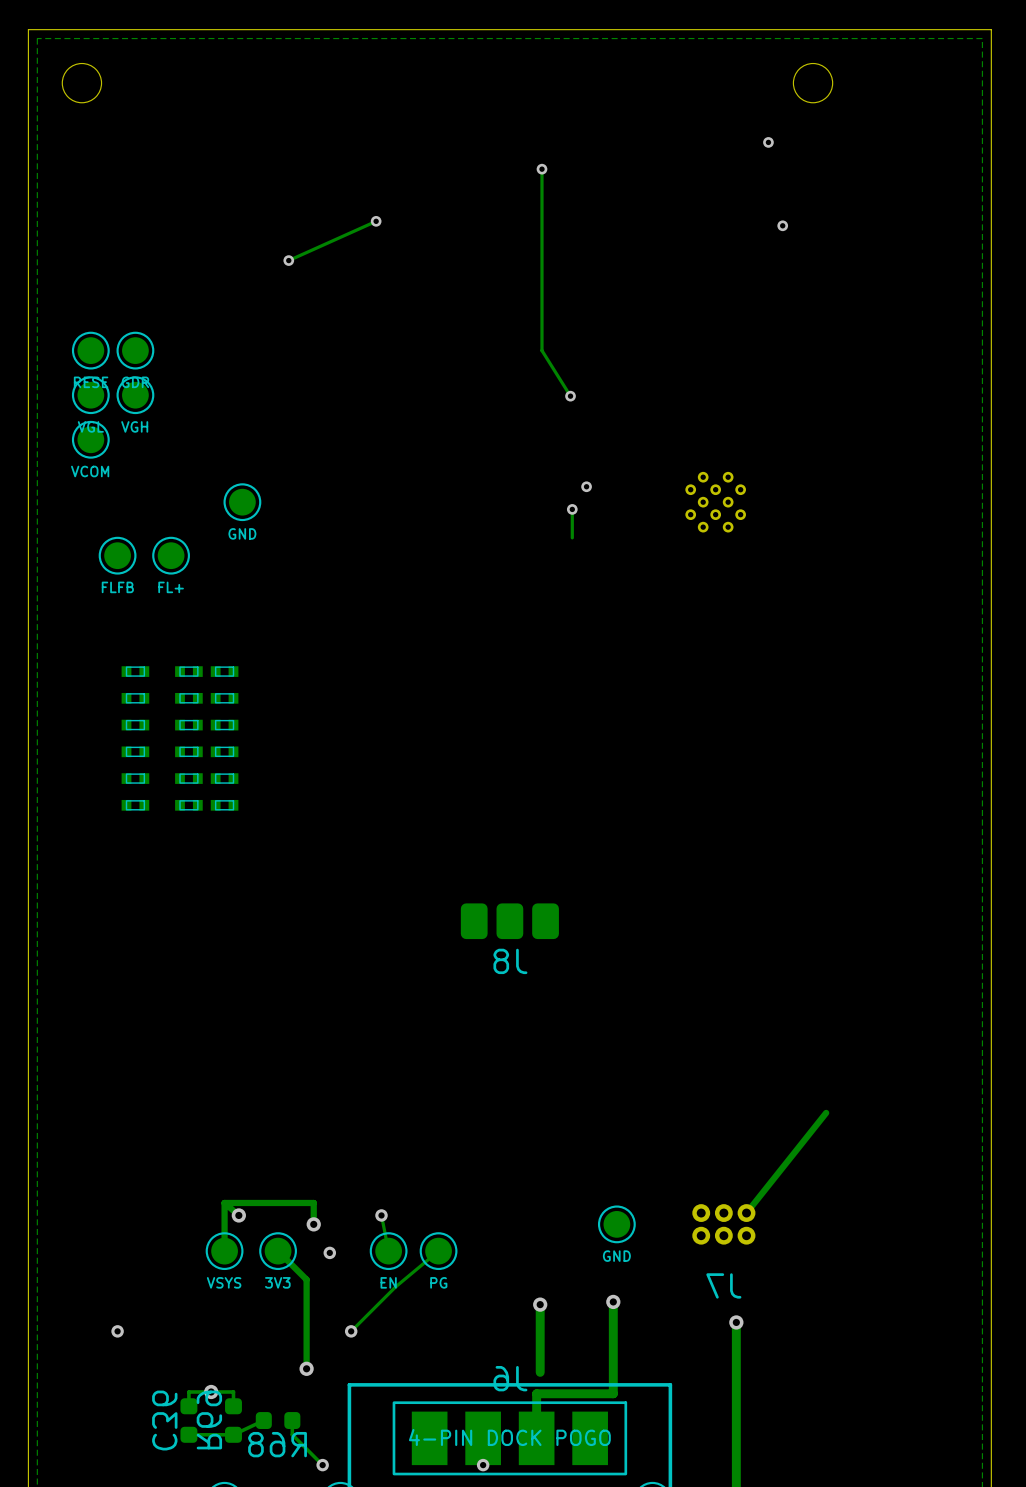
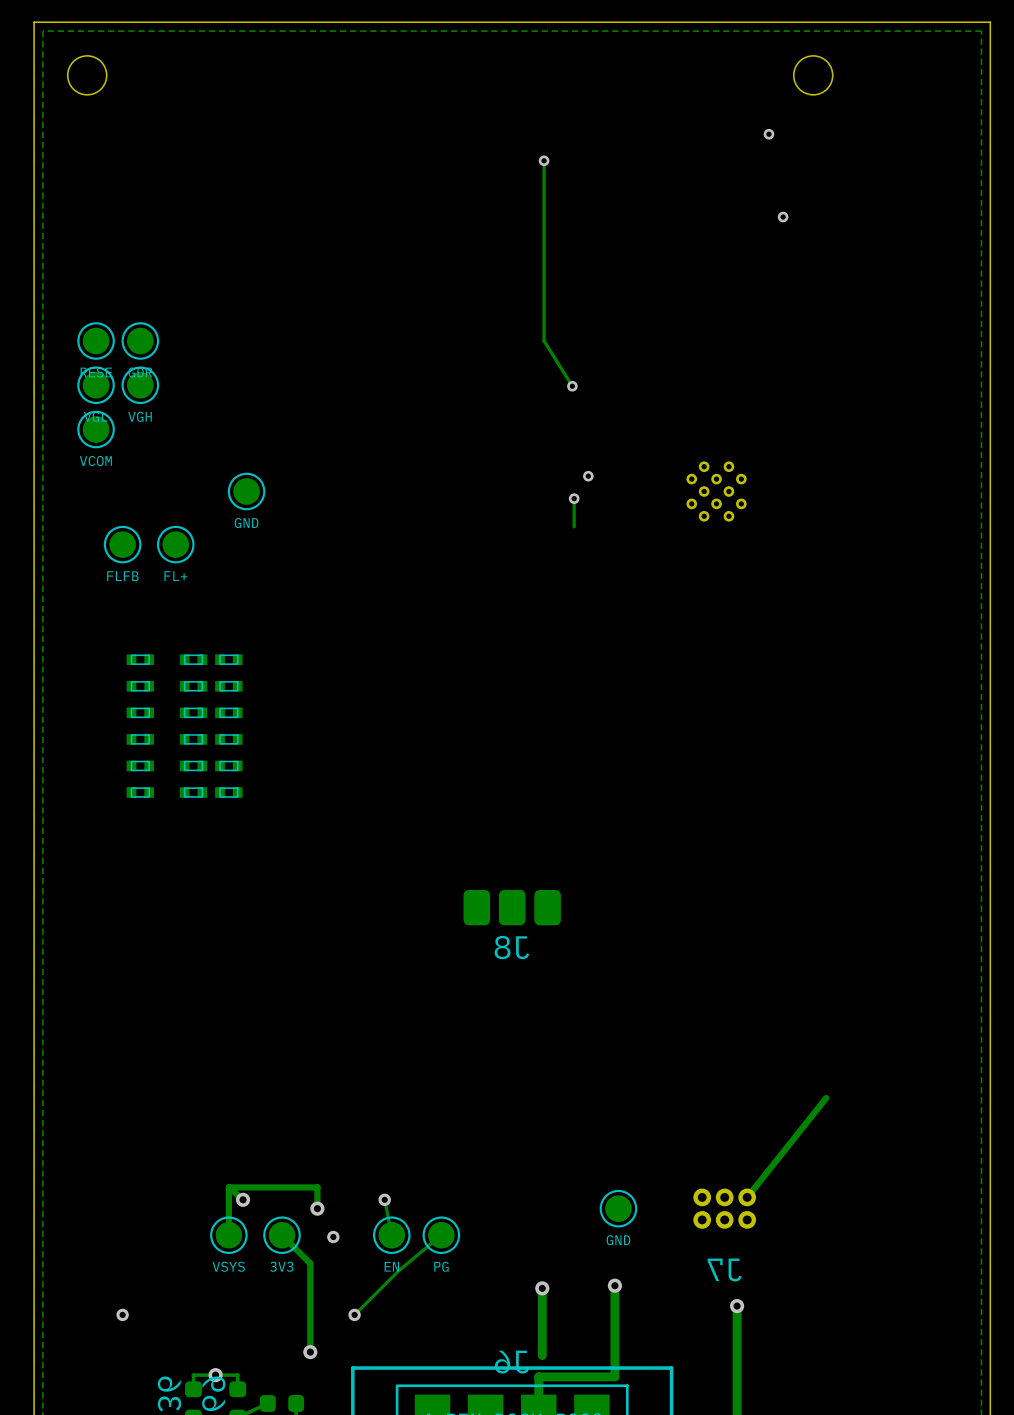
track: (376, 221) (288, 260) -> none
via: (376, 221) -> none
via: (288, 260) -> none

